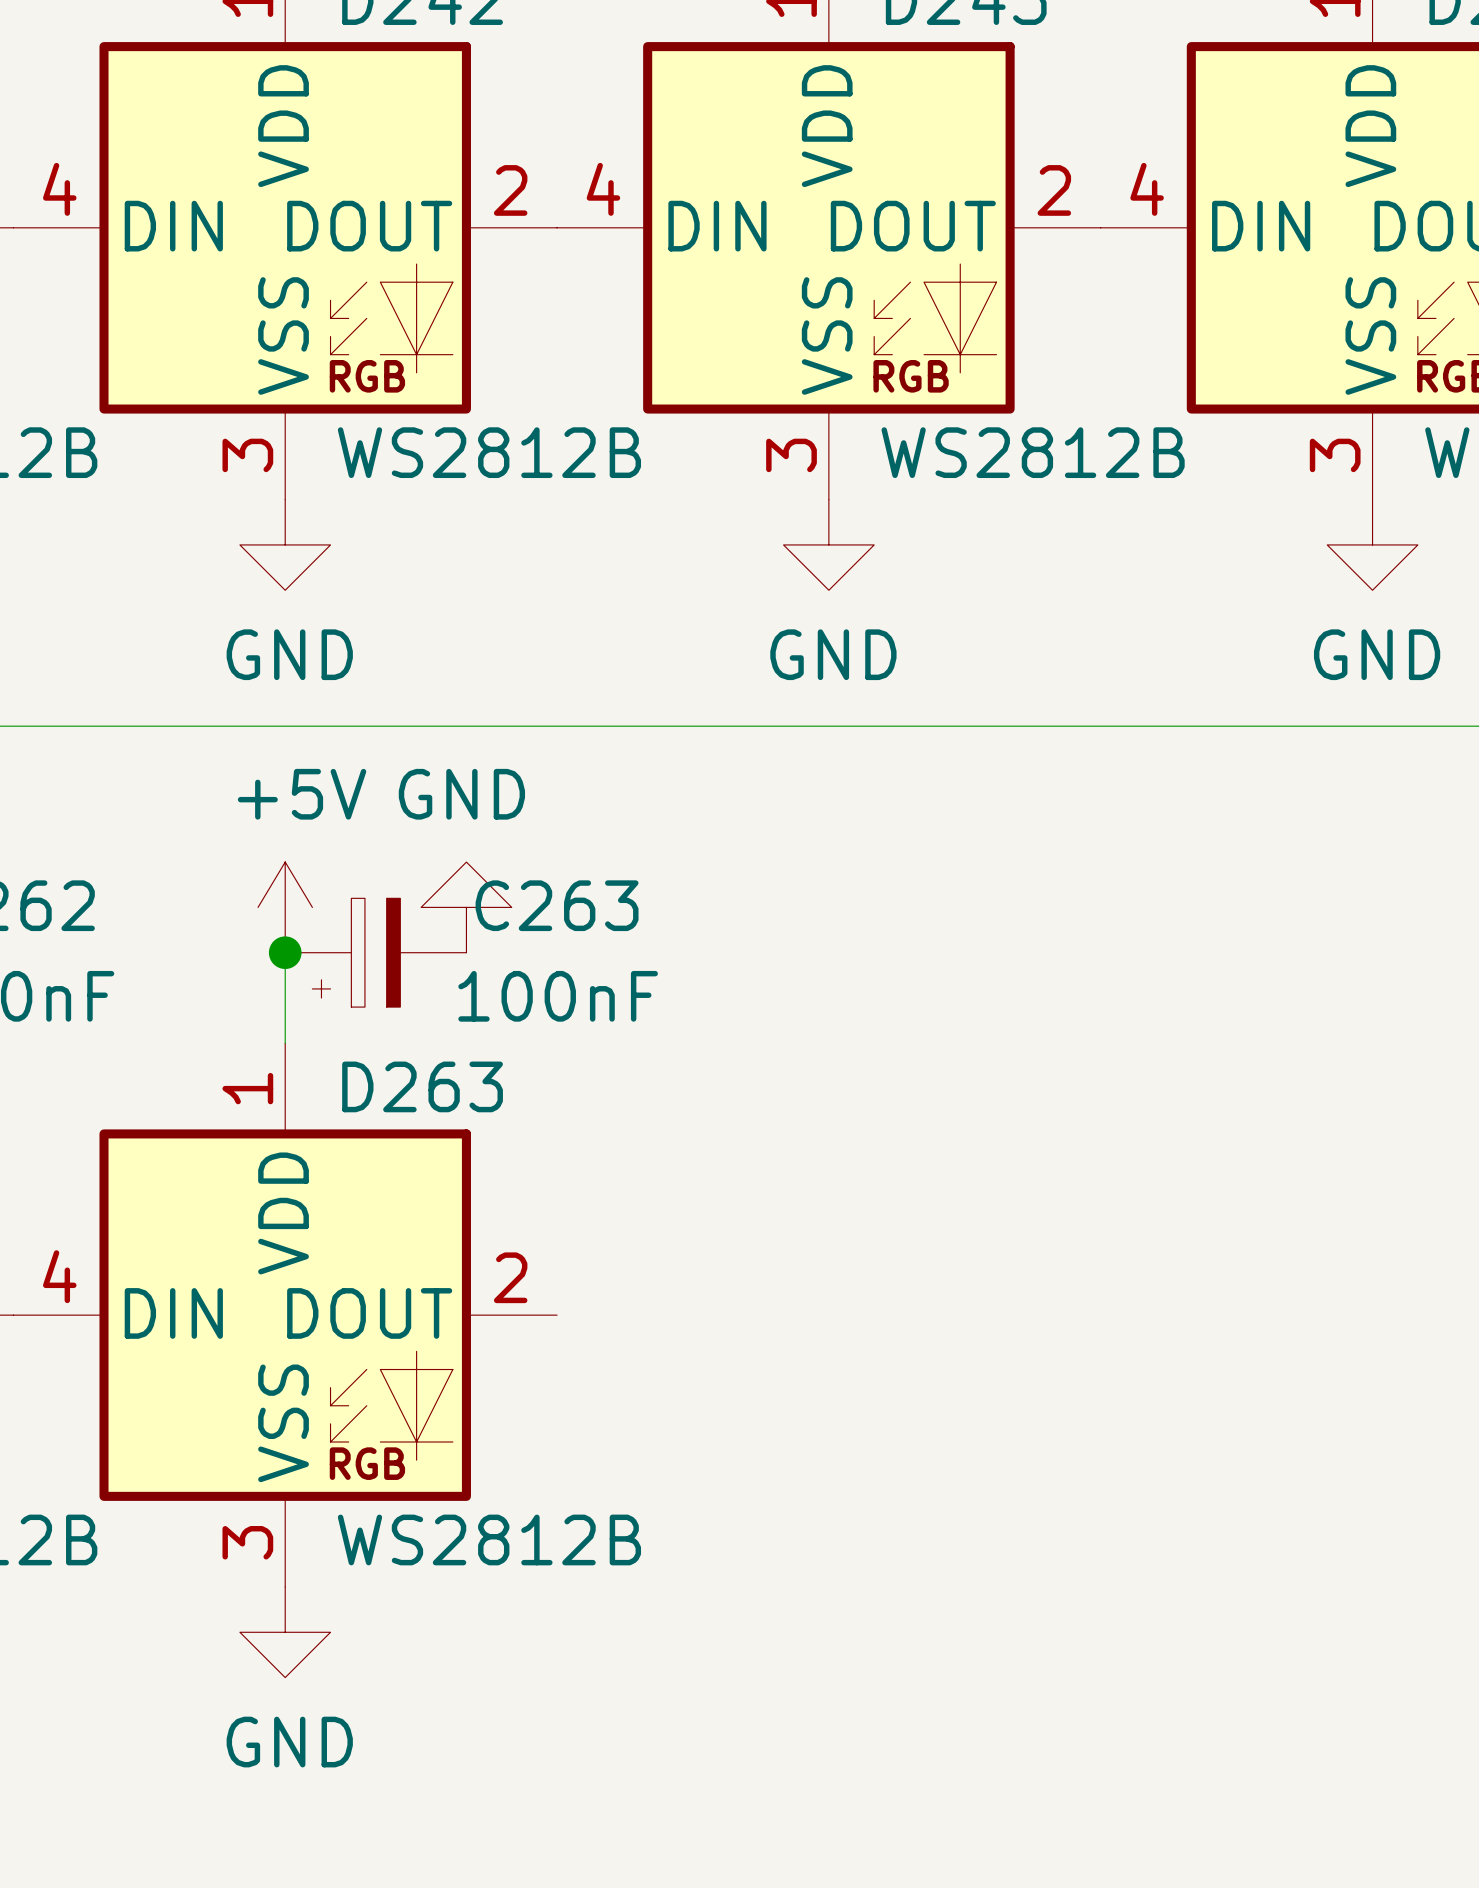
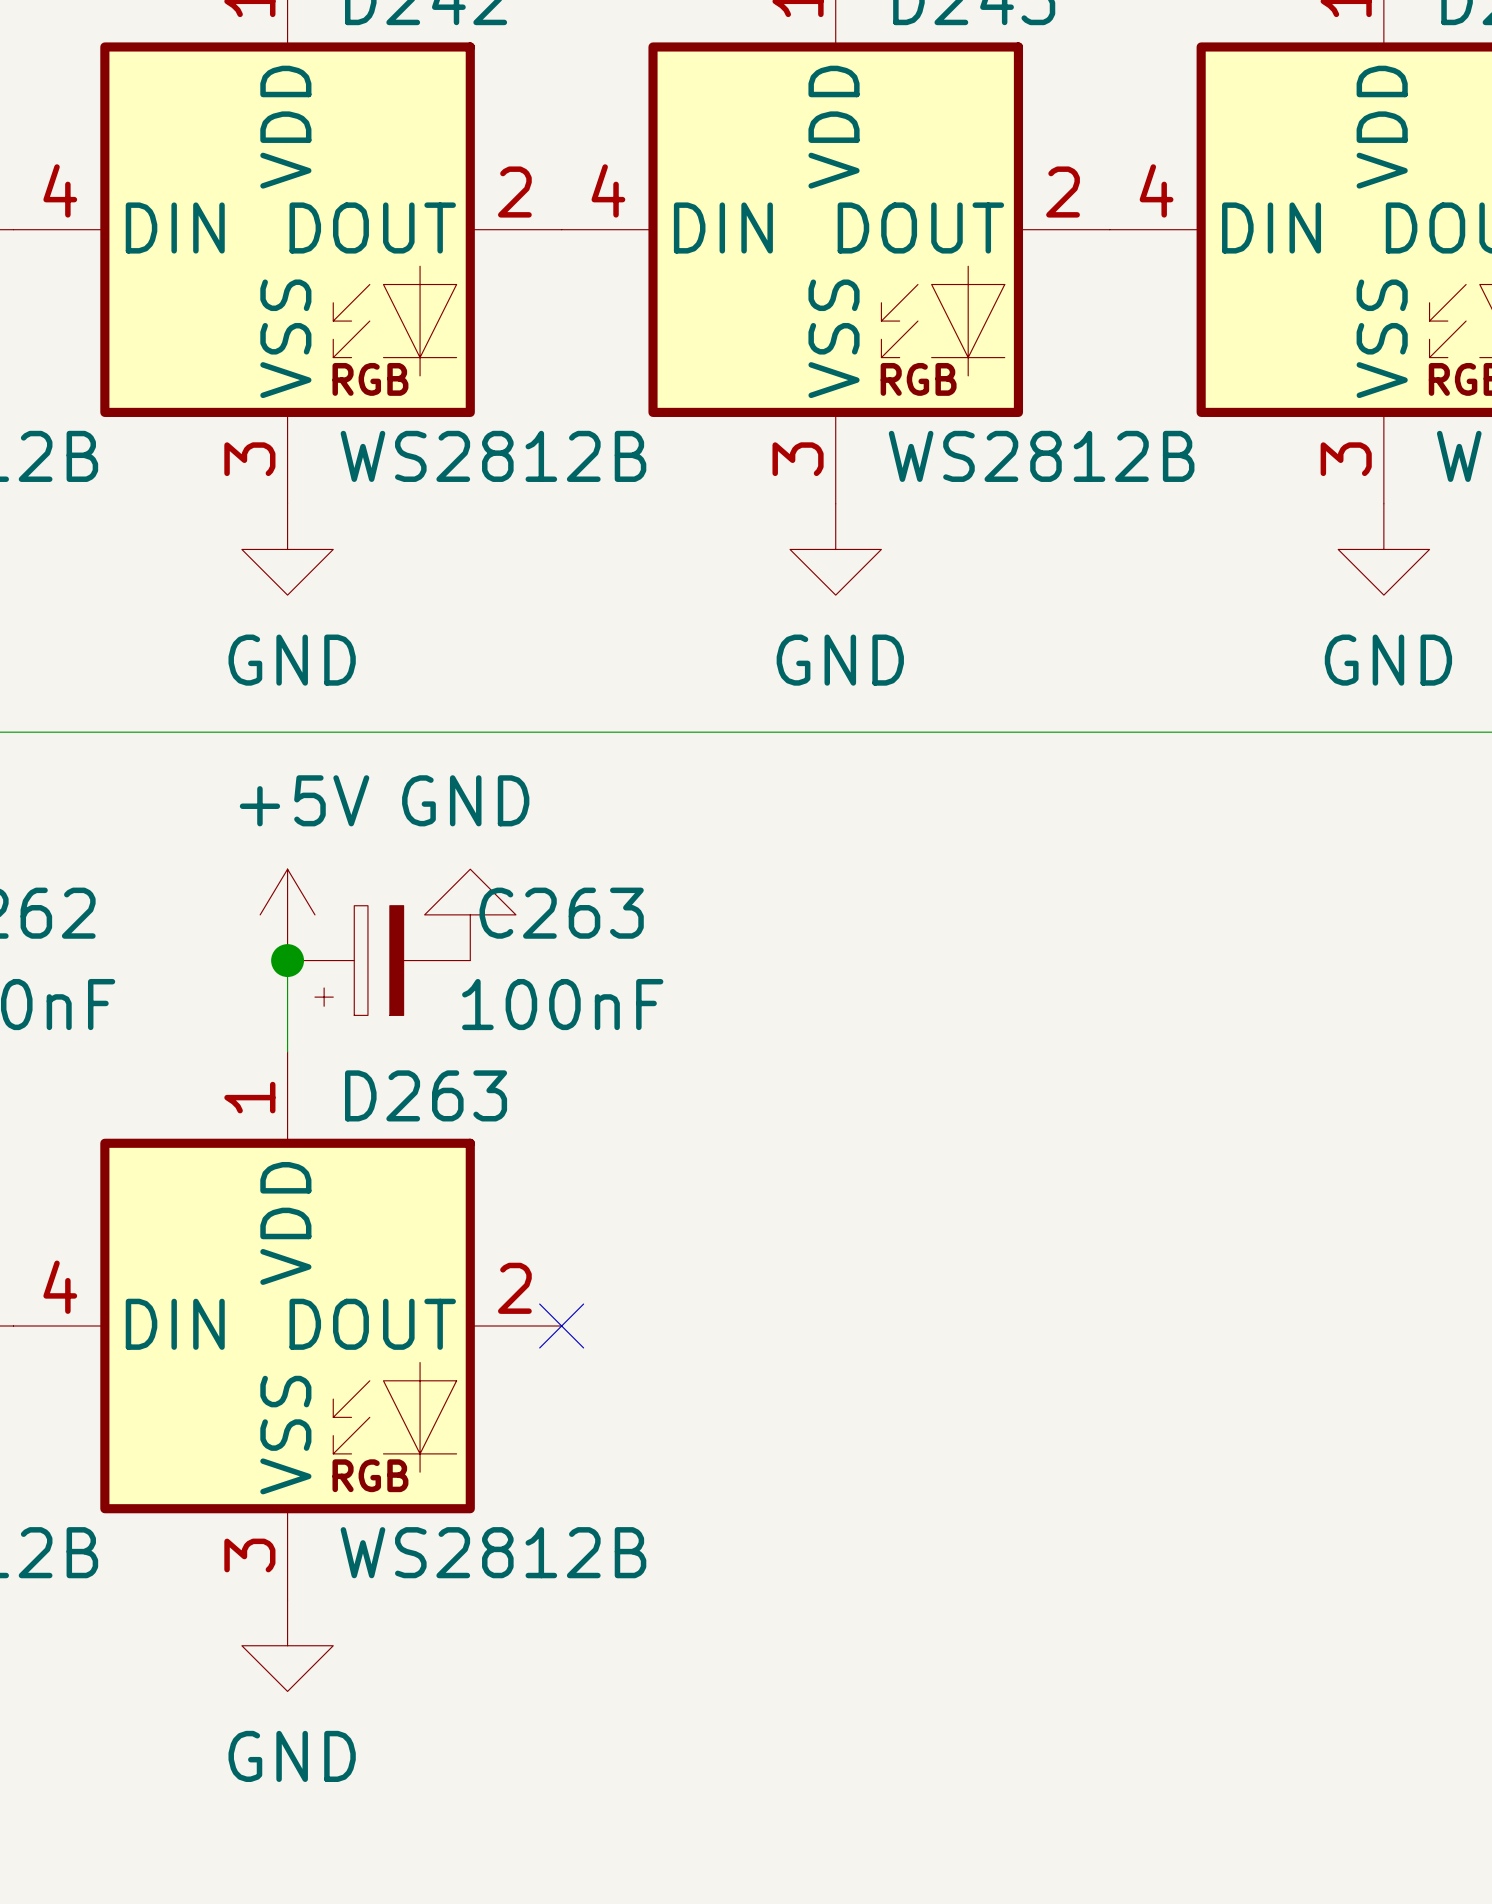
no-connect mark: none -> (561, 1325)

